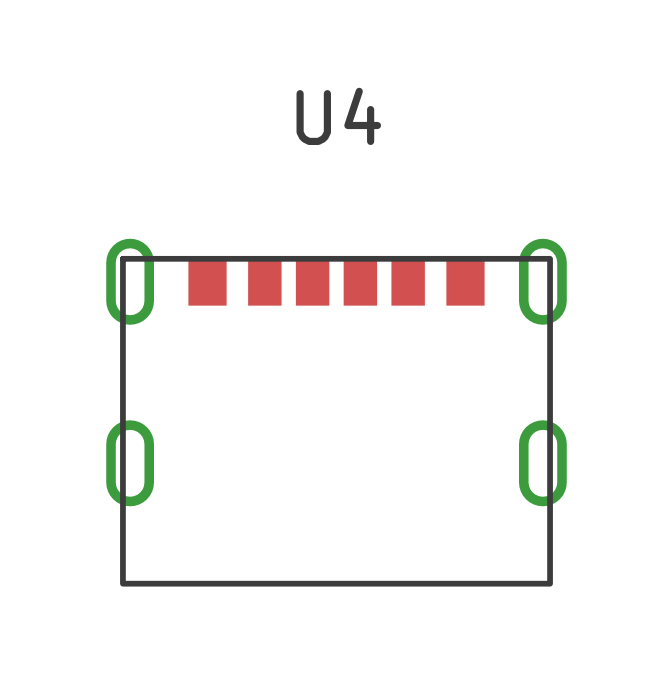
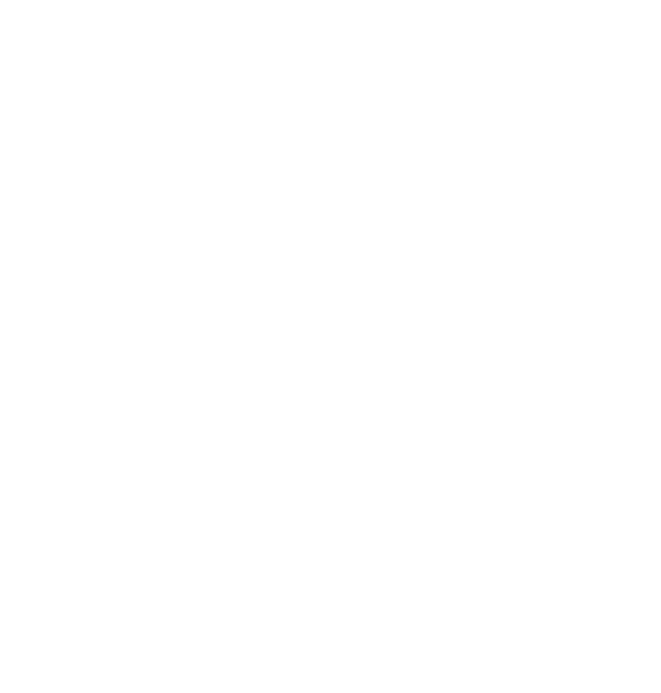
U4: (336, 412) -> none

